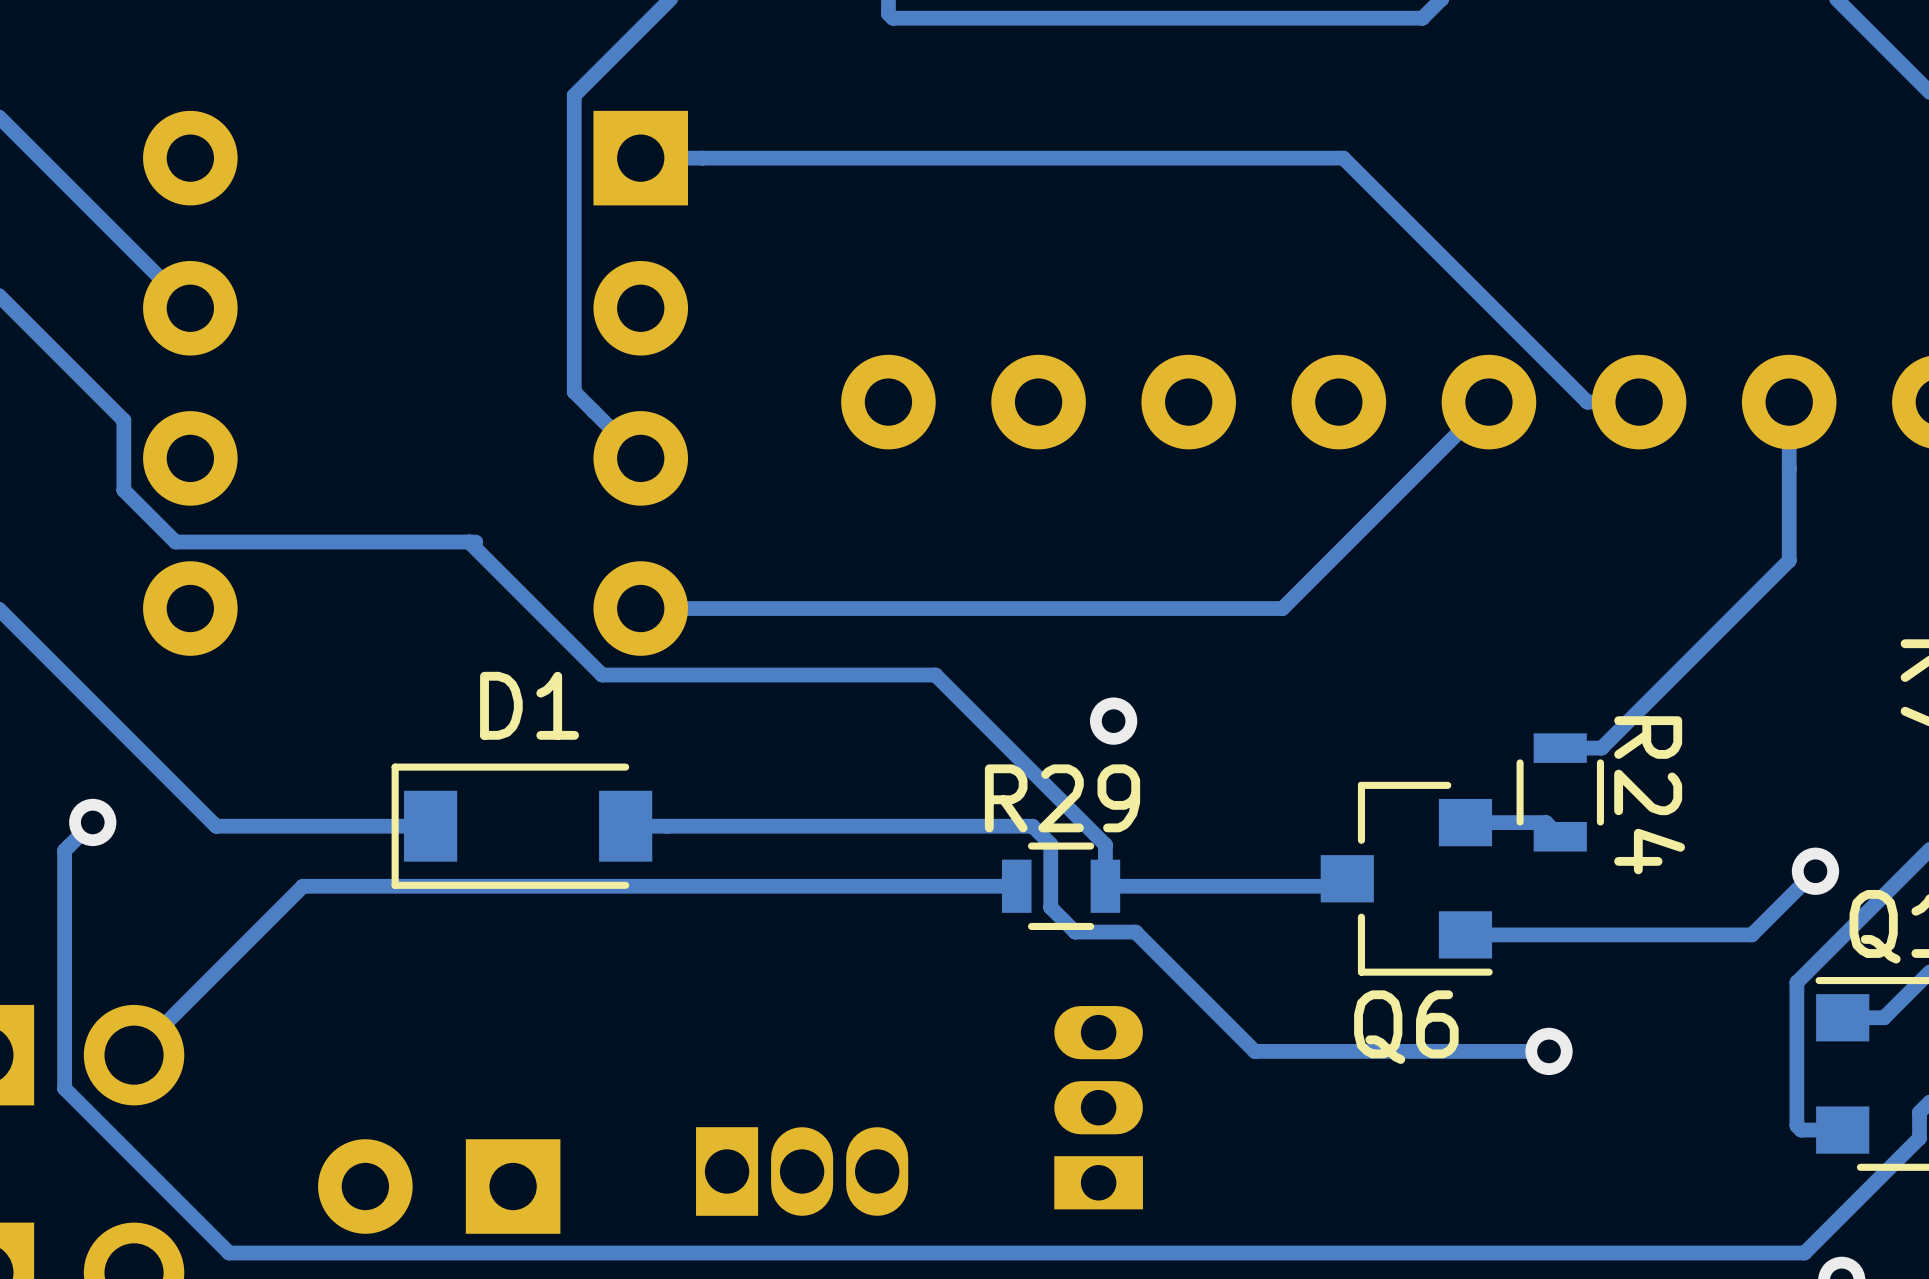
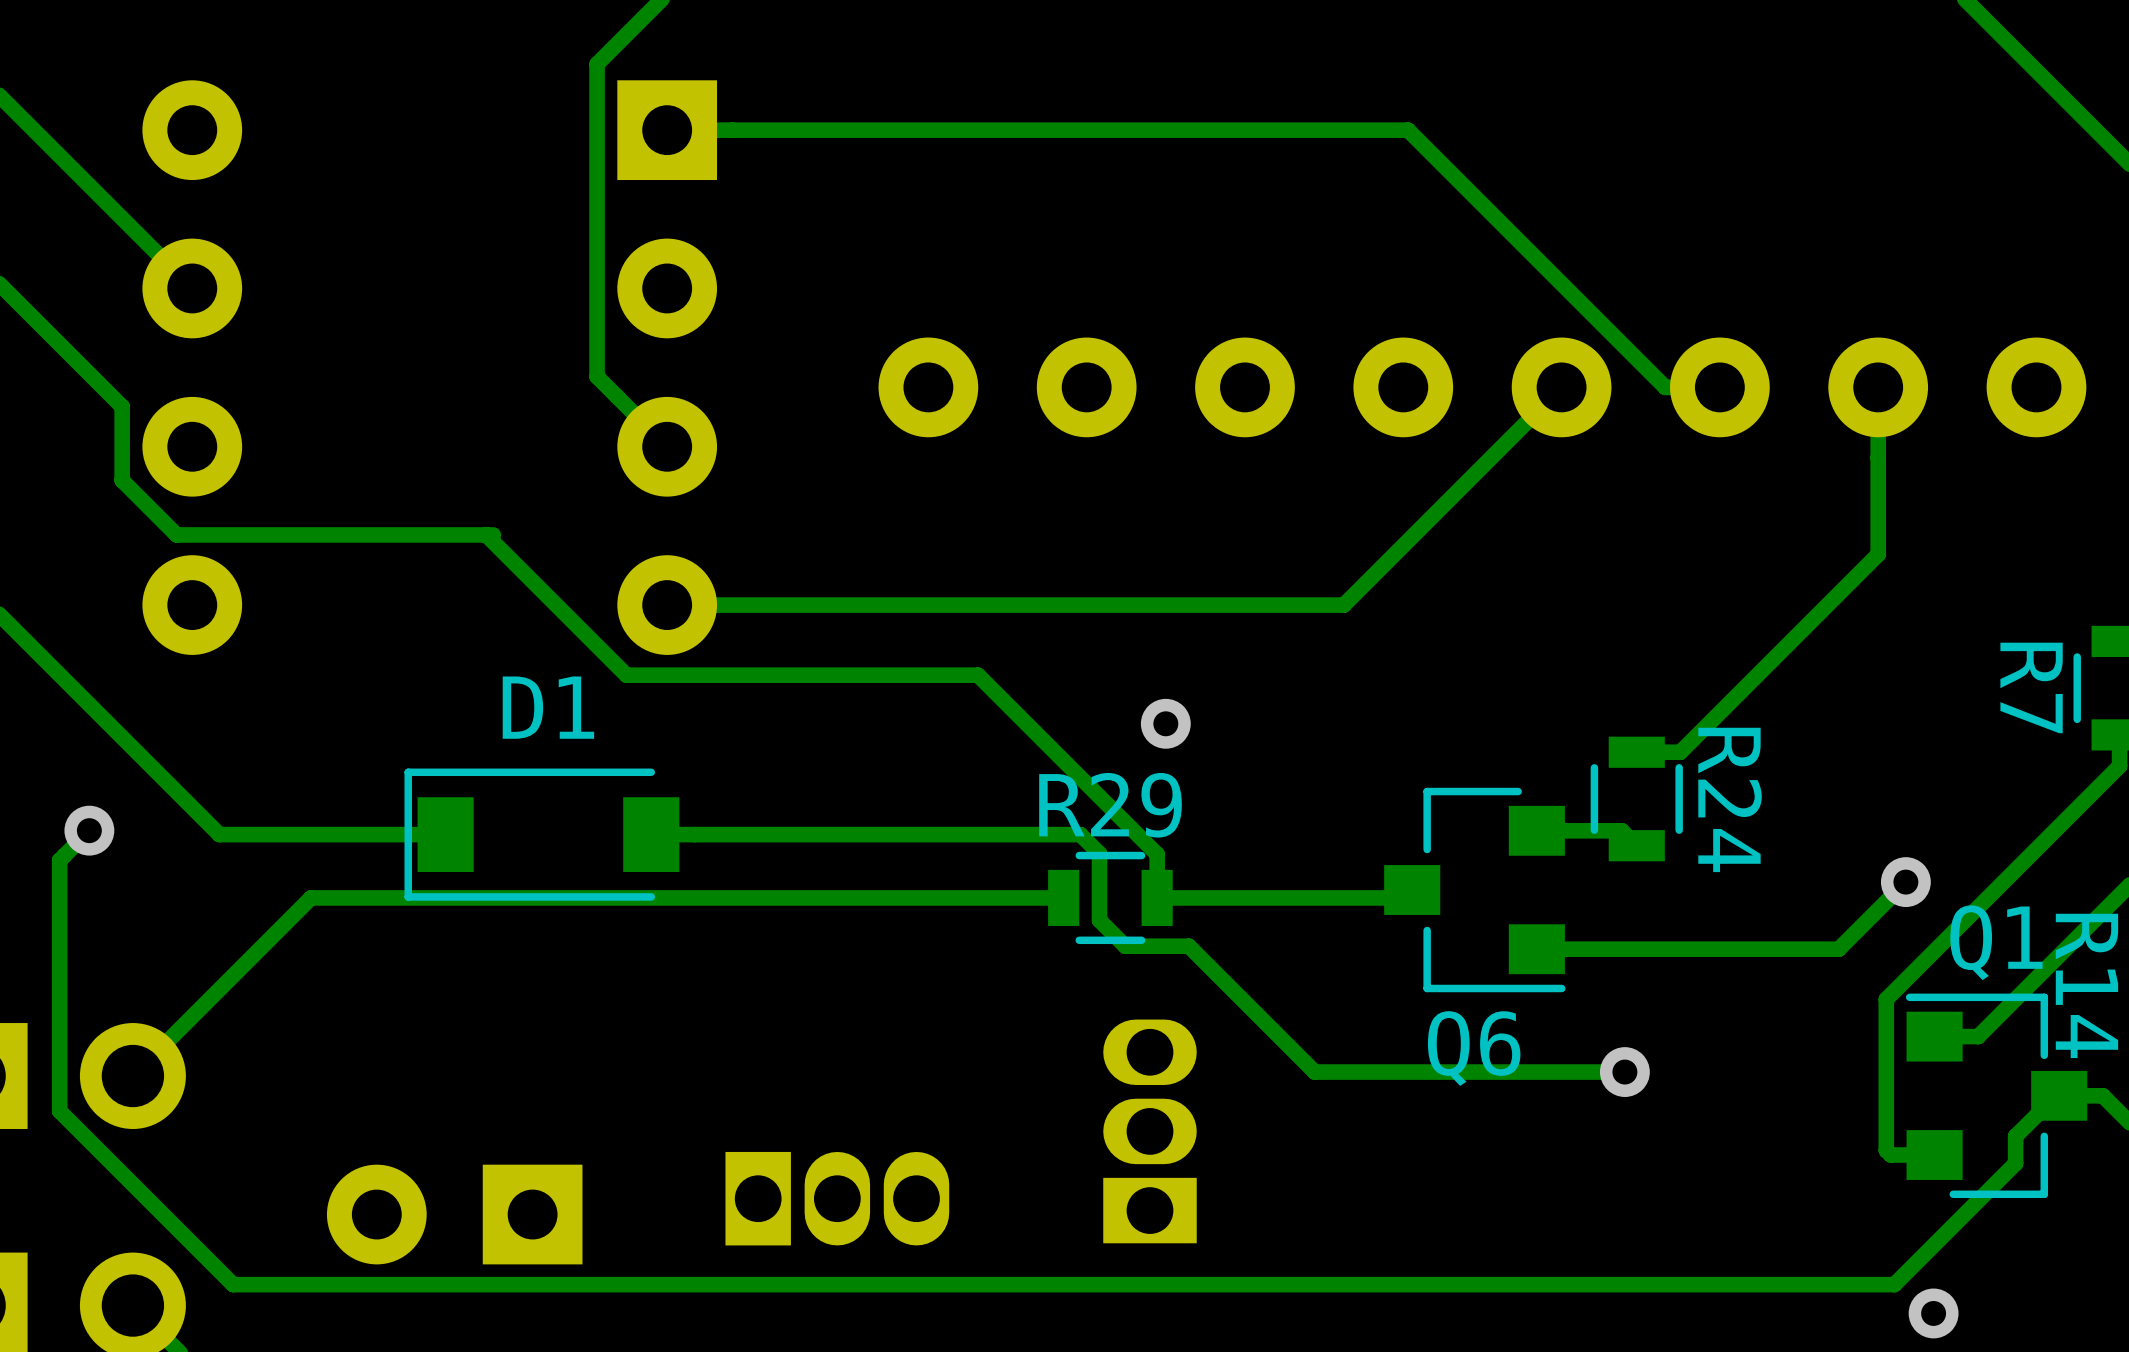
part footprint: [1054, 1006, 1143, 1210] -> [1103, 1019, 1197, 1244]

